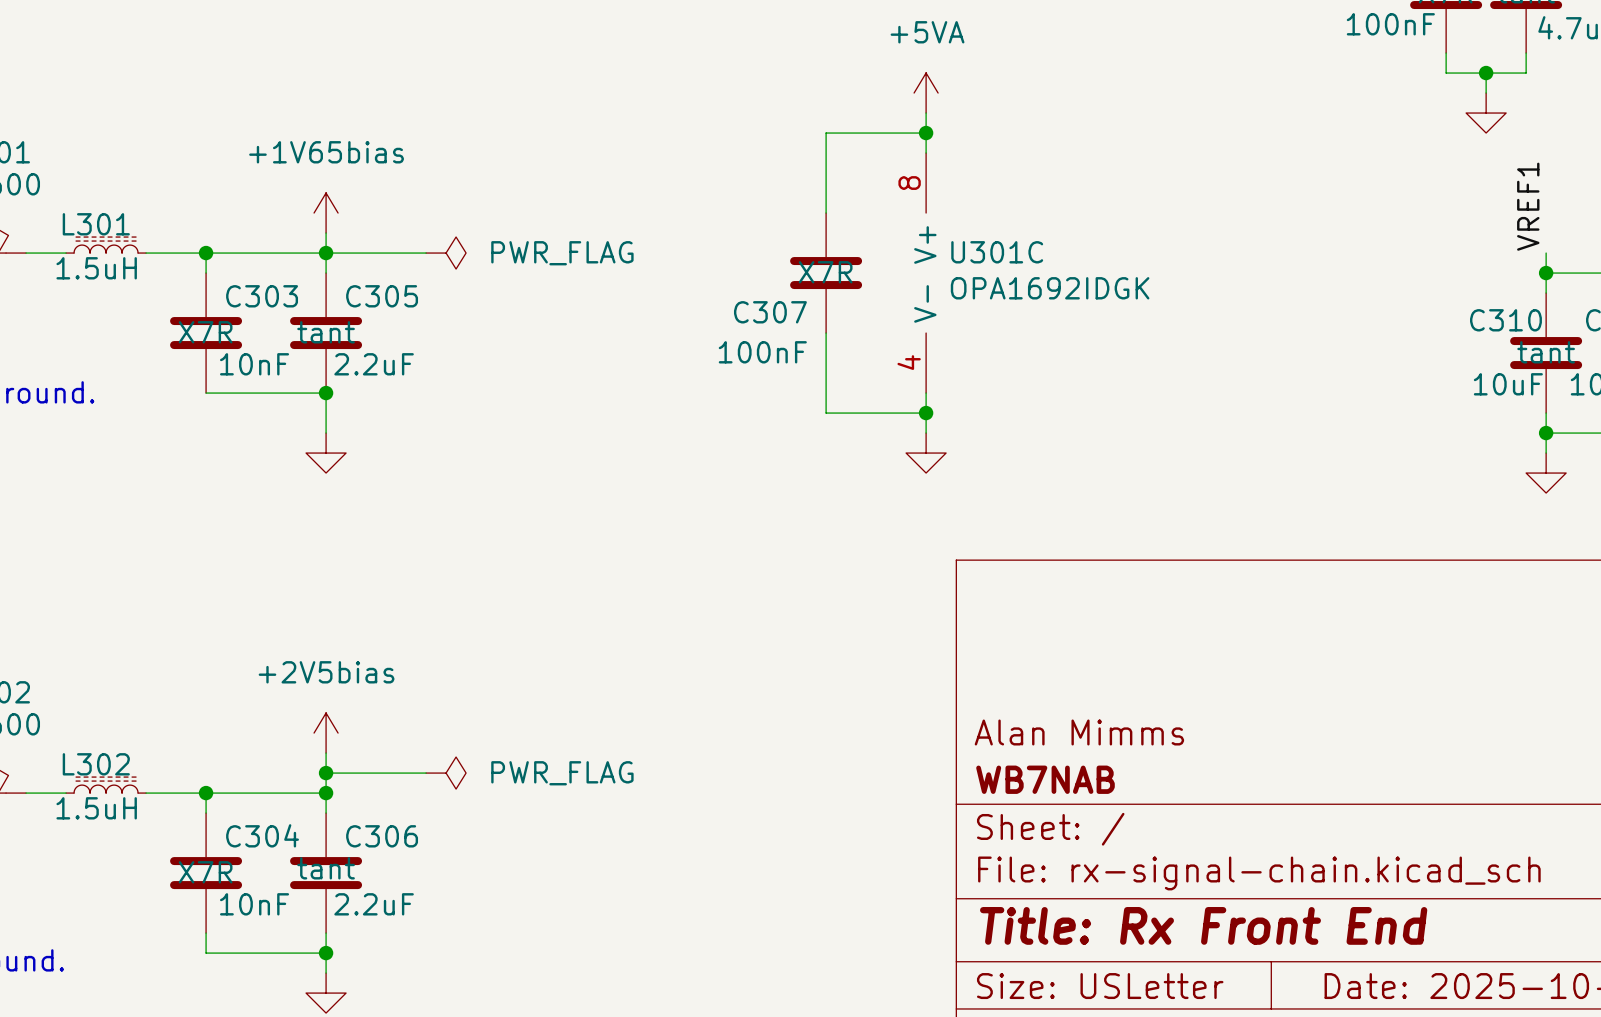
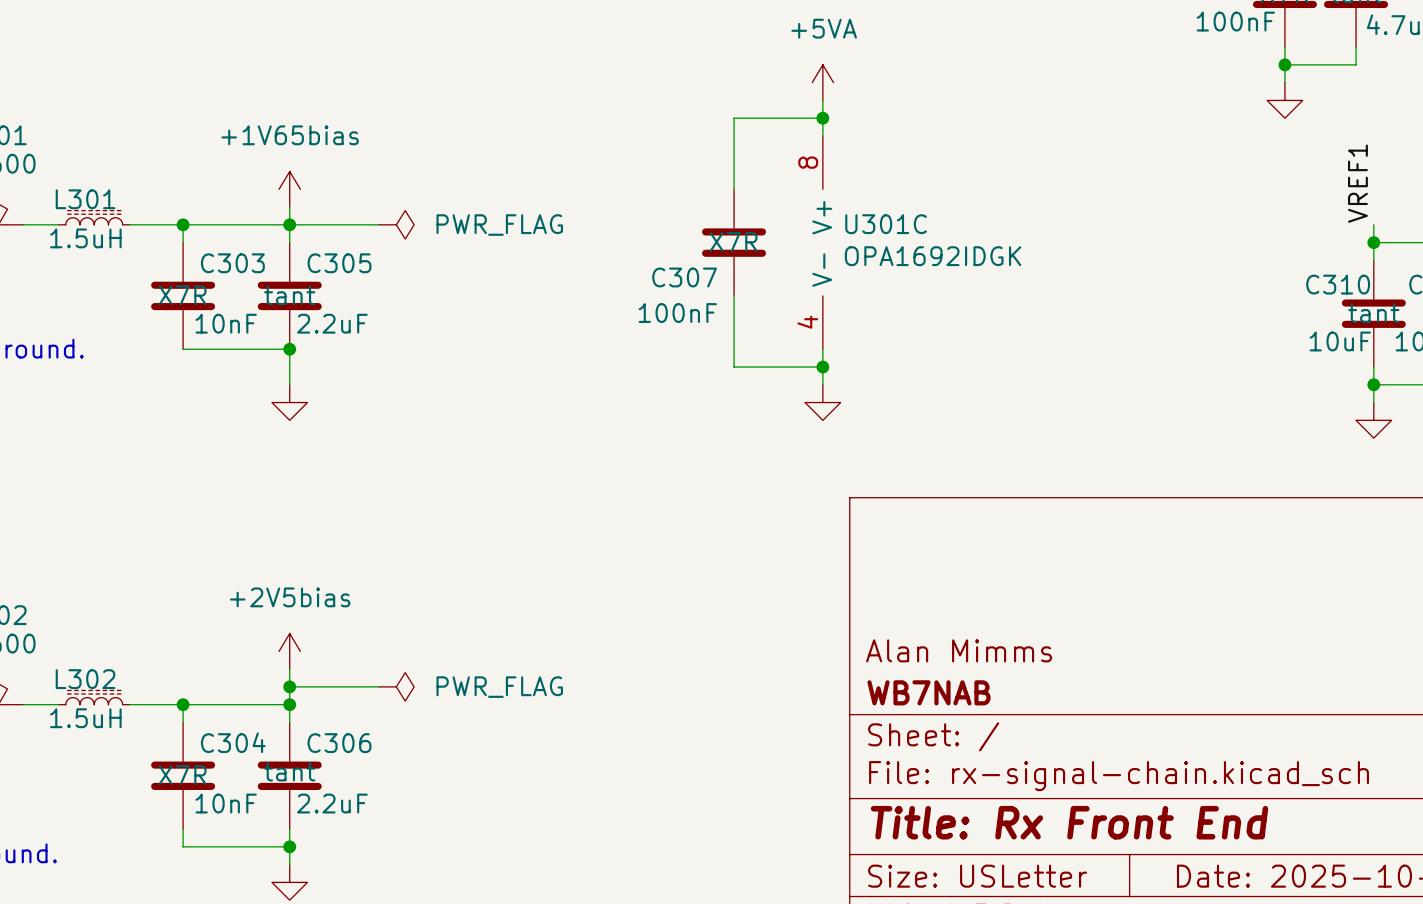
wire: (1486, 73) (1486, 93) -> (1284, 64) (1284, 82)
junction position: (1486, 73) -> (1284, 64)
power symbol position: (1486, 113) -> (1284, 100)

